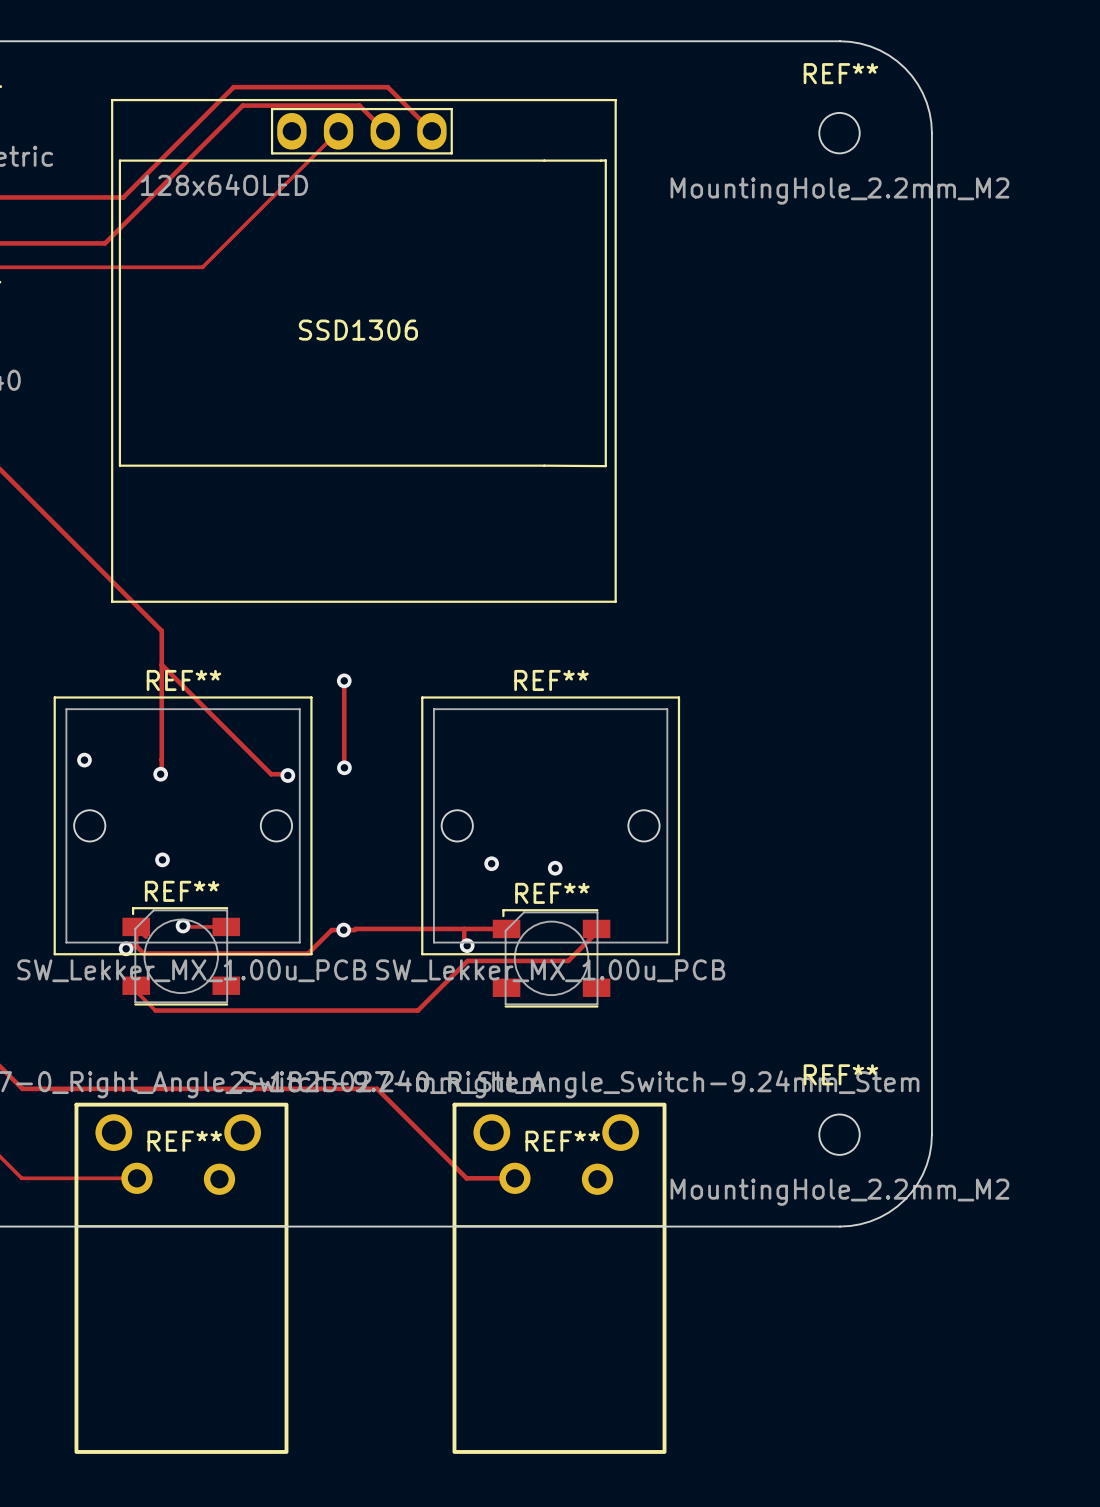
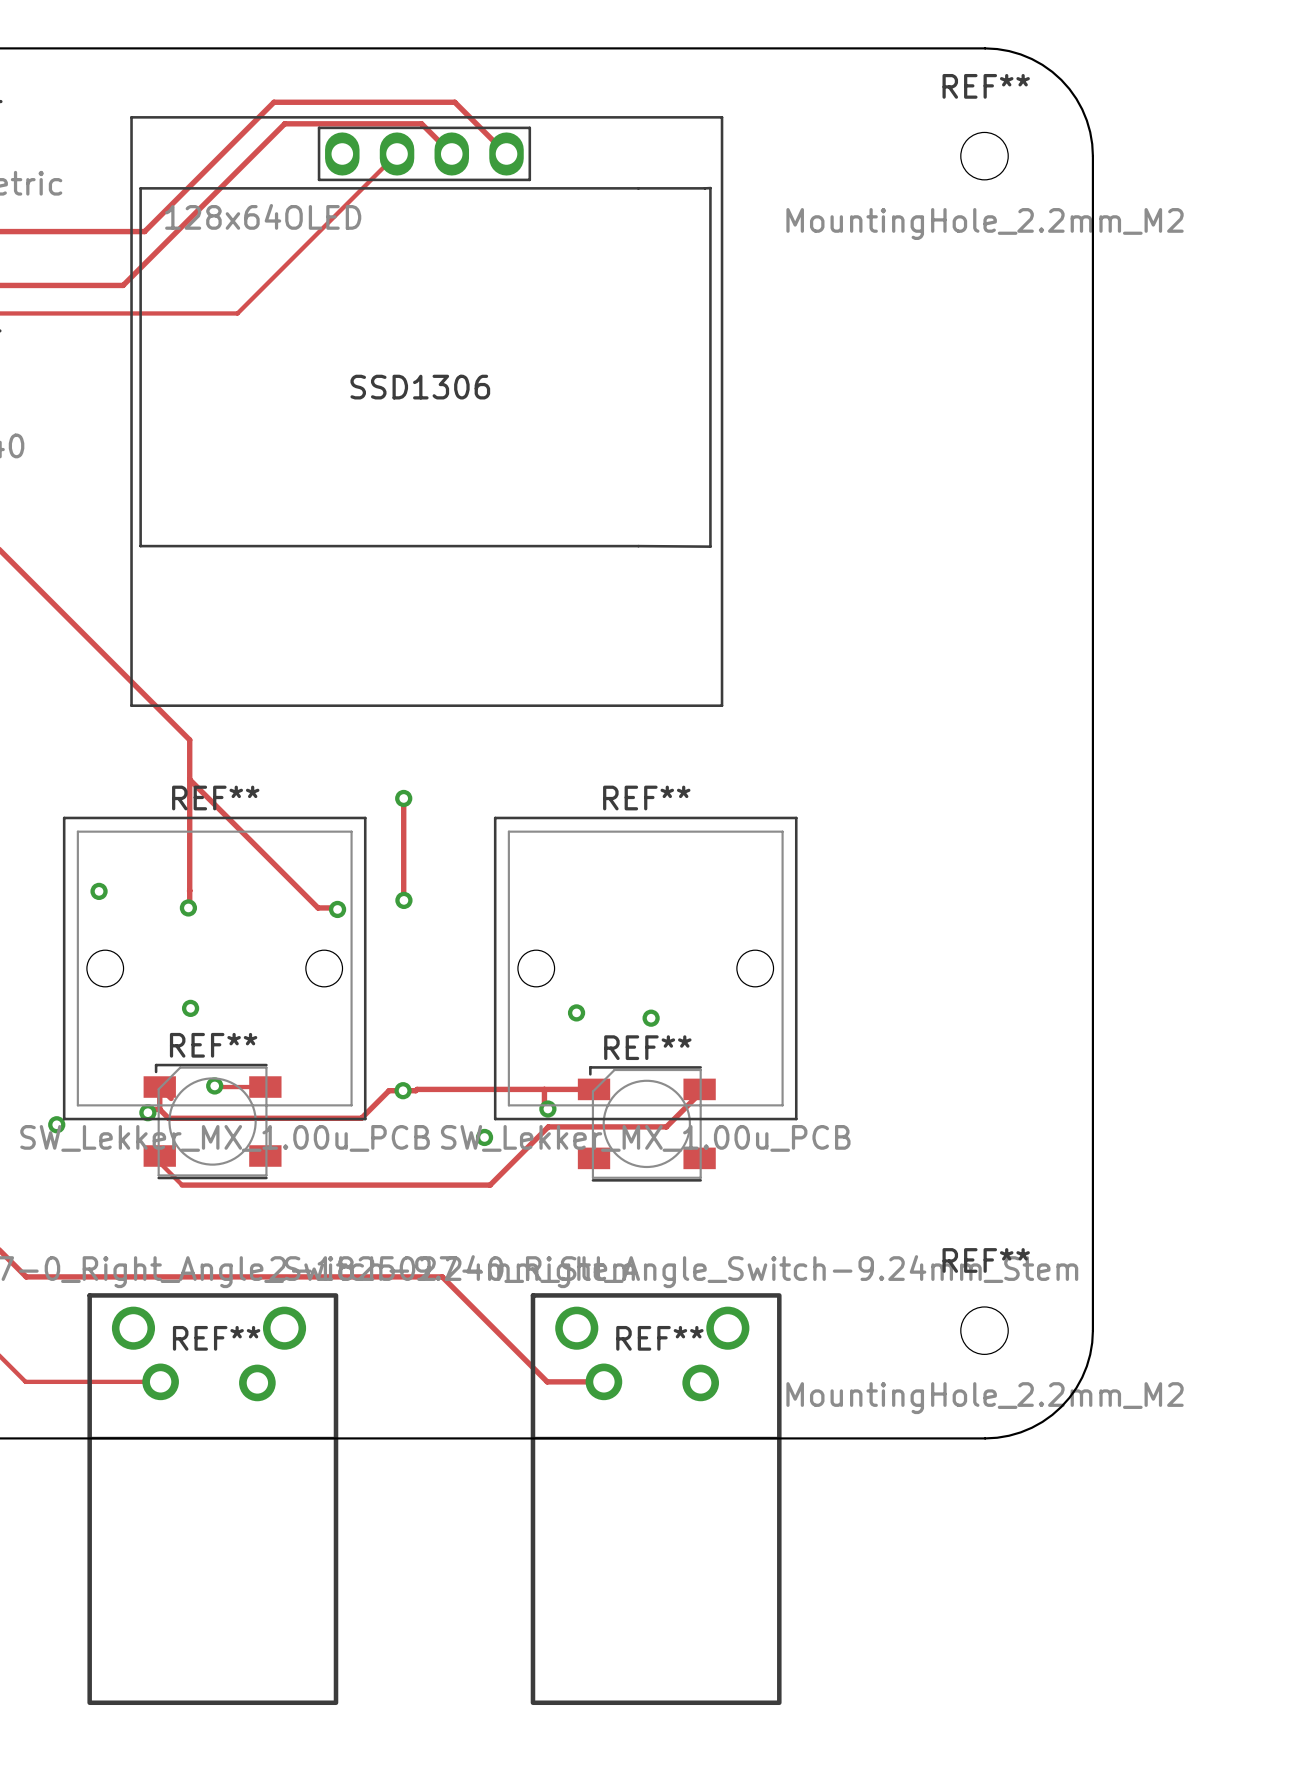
via: none -> (56, 1124)
via: none -> (484, 1137)

